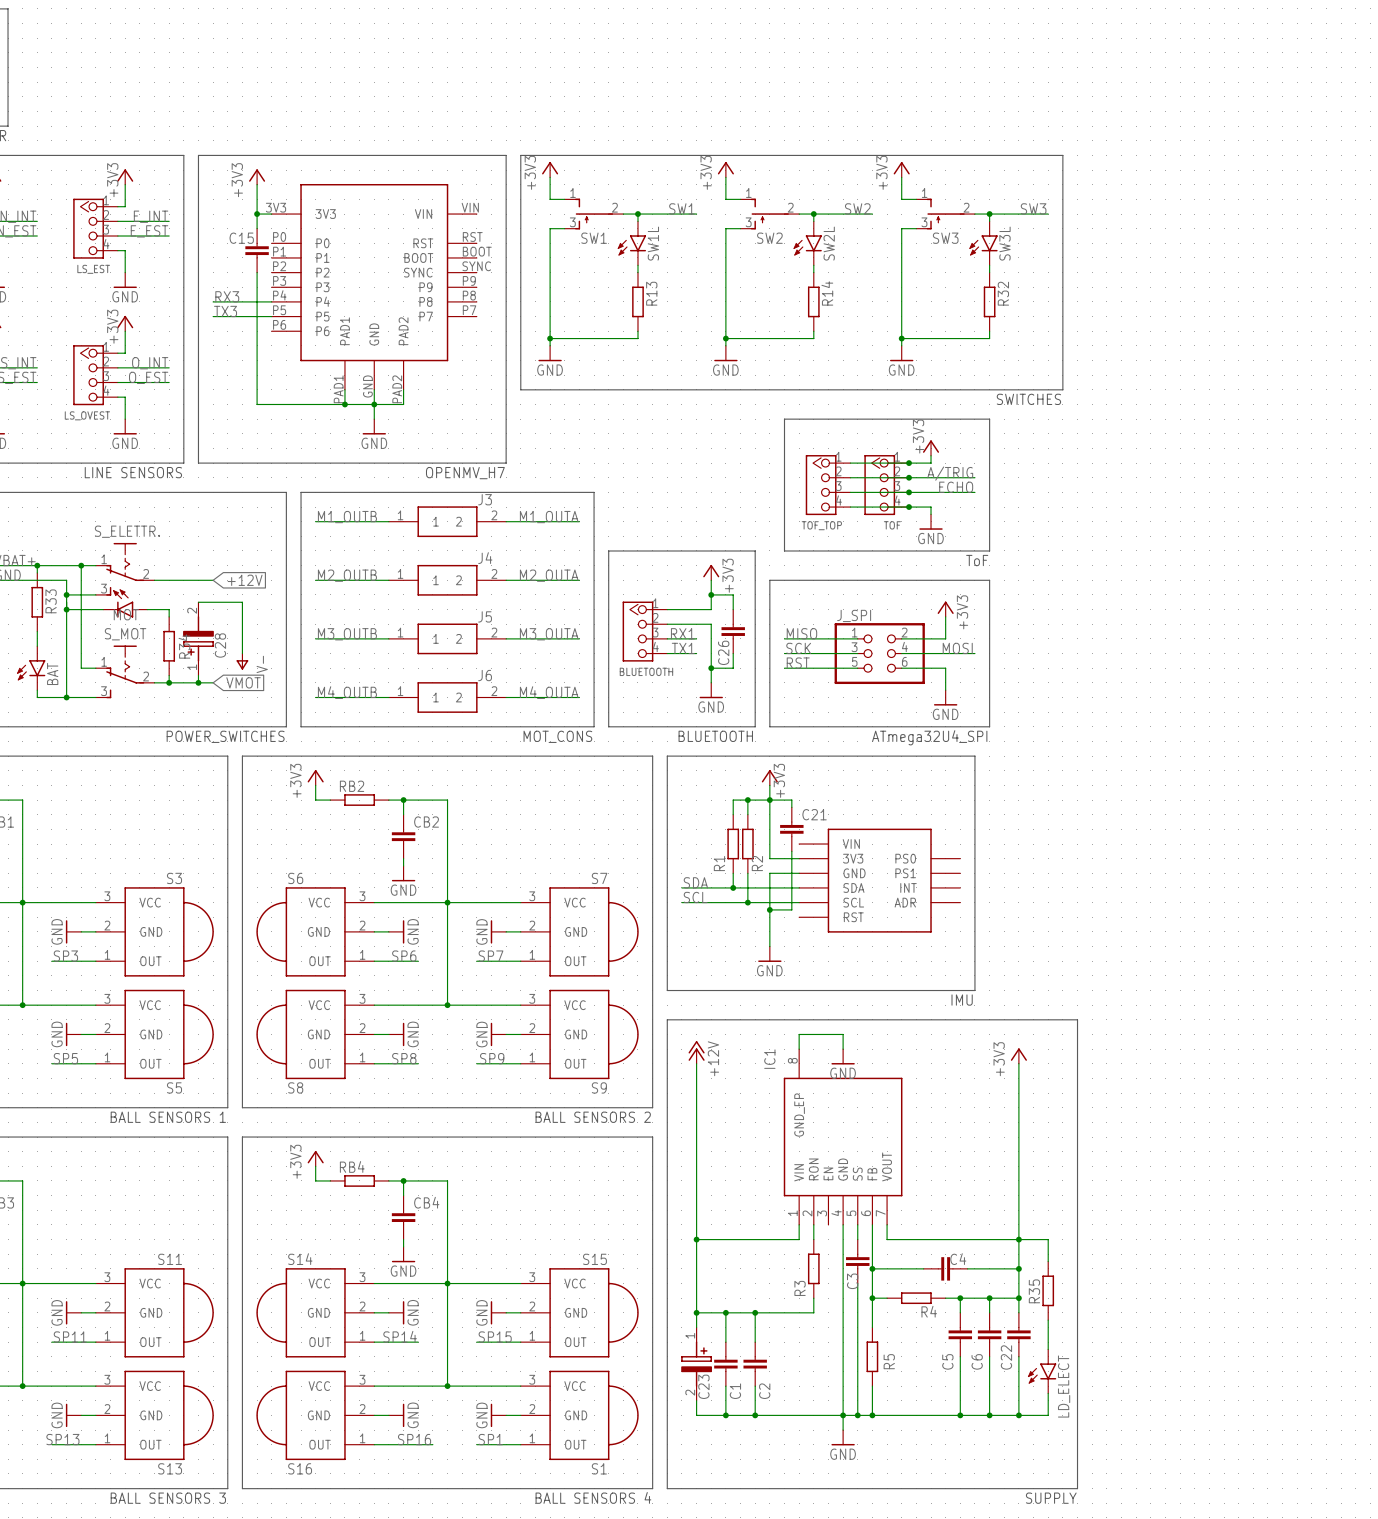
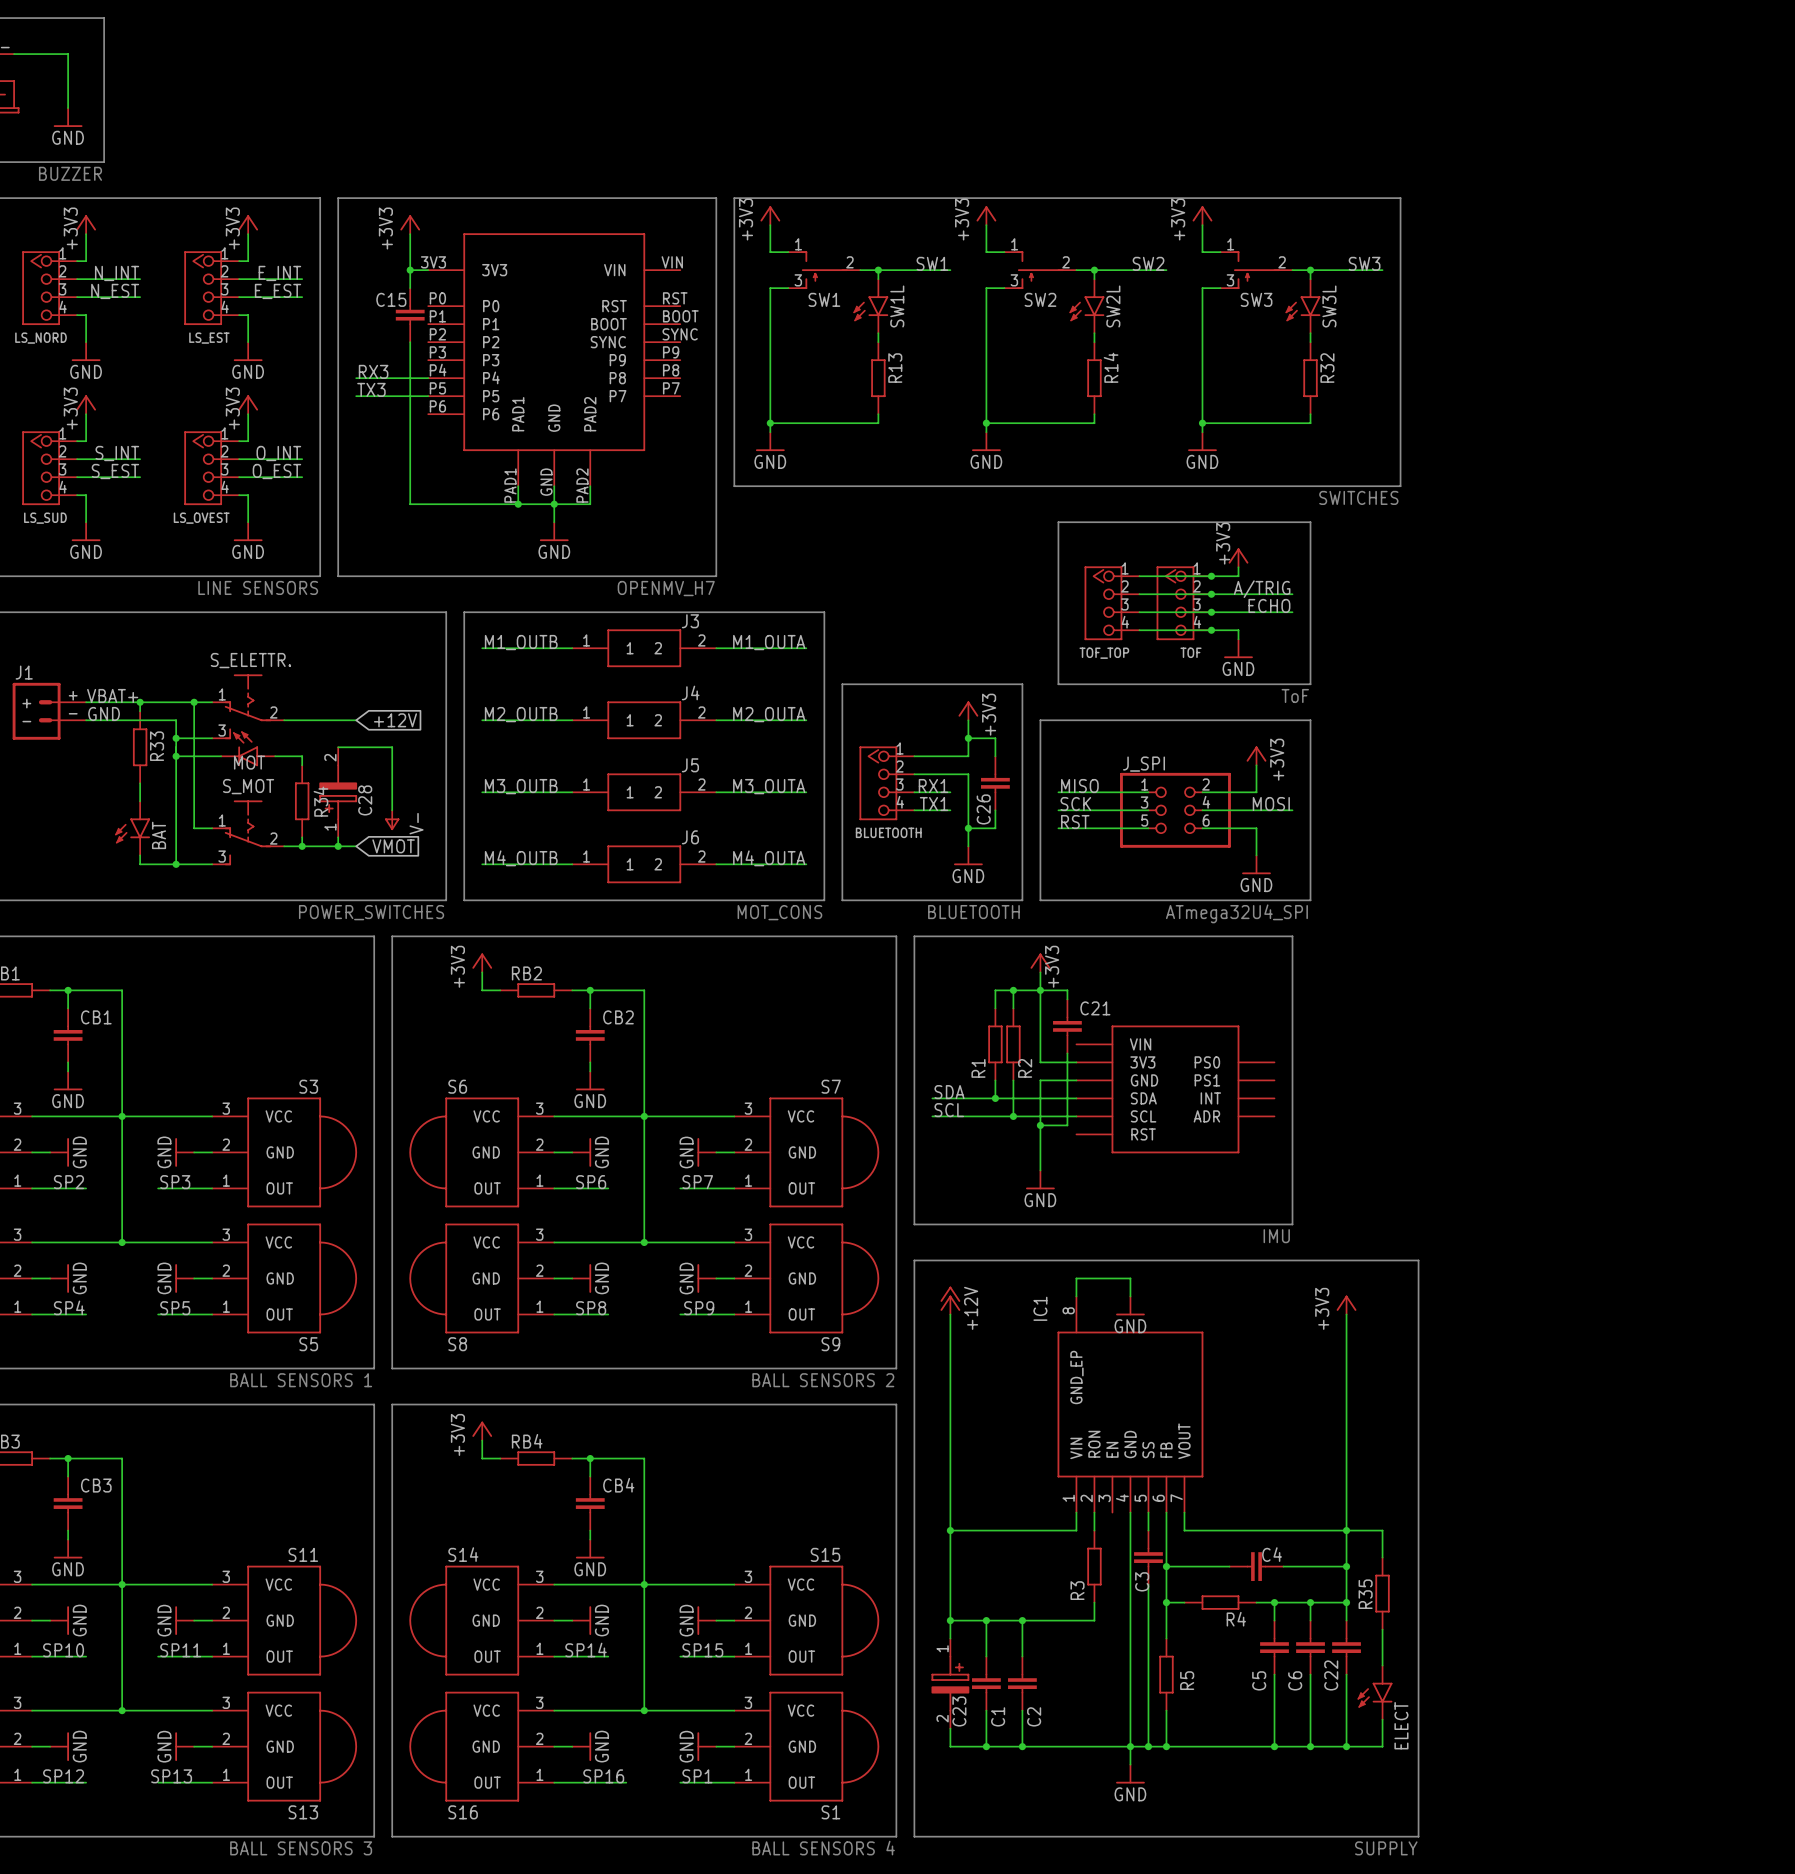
LD_ELECT name: LD_ELECT (1064, 1386) -> ELECT (1401, 1725)

